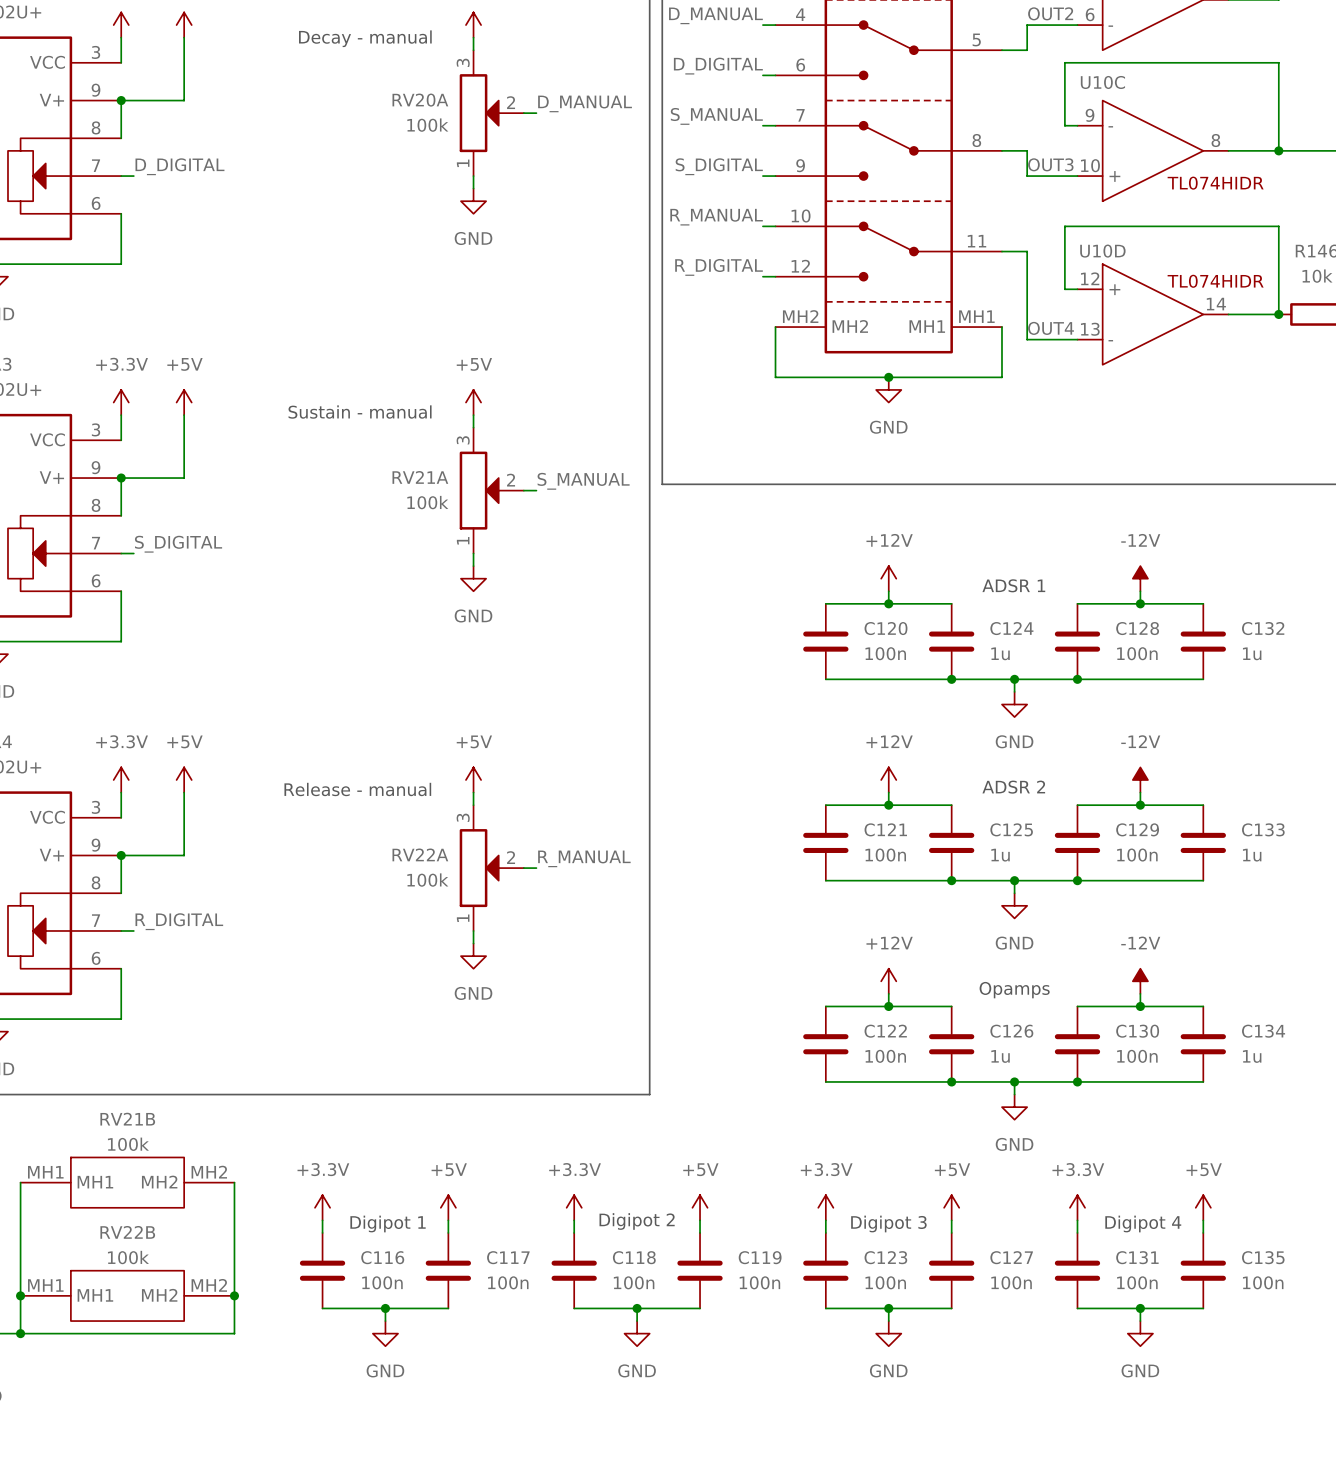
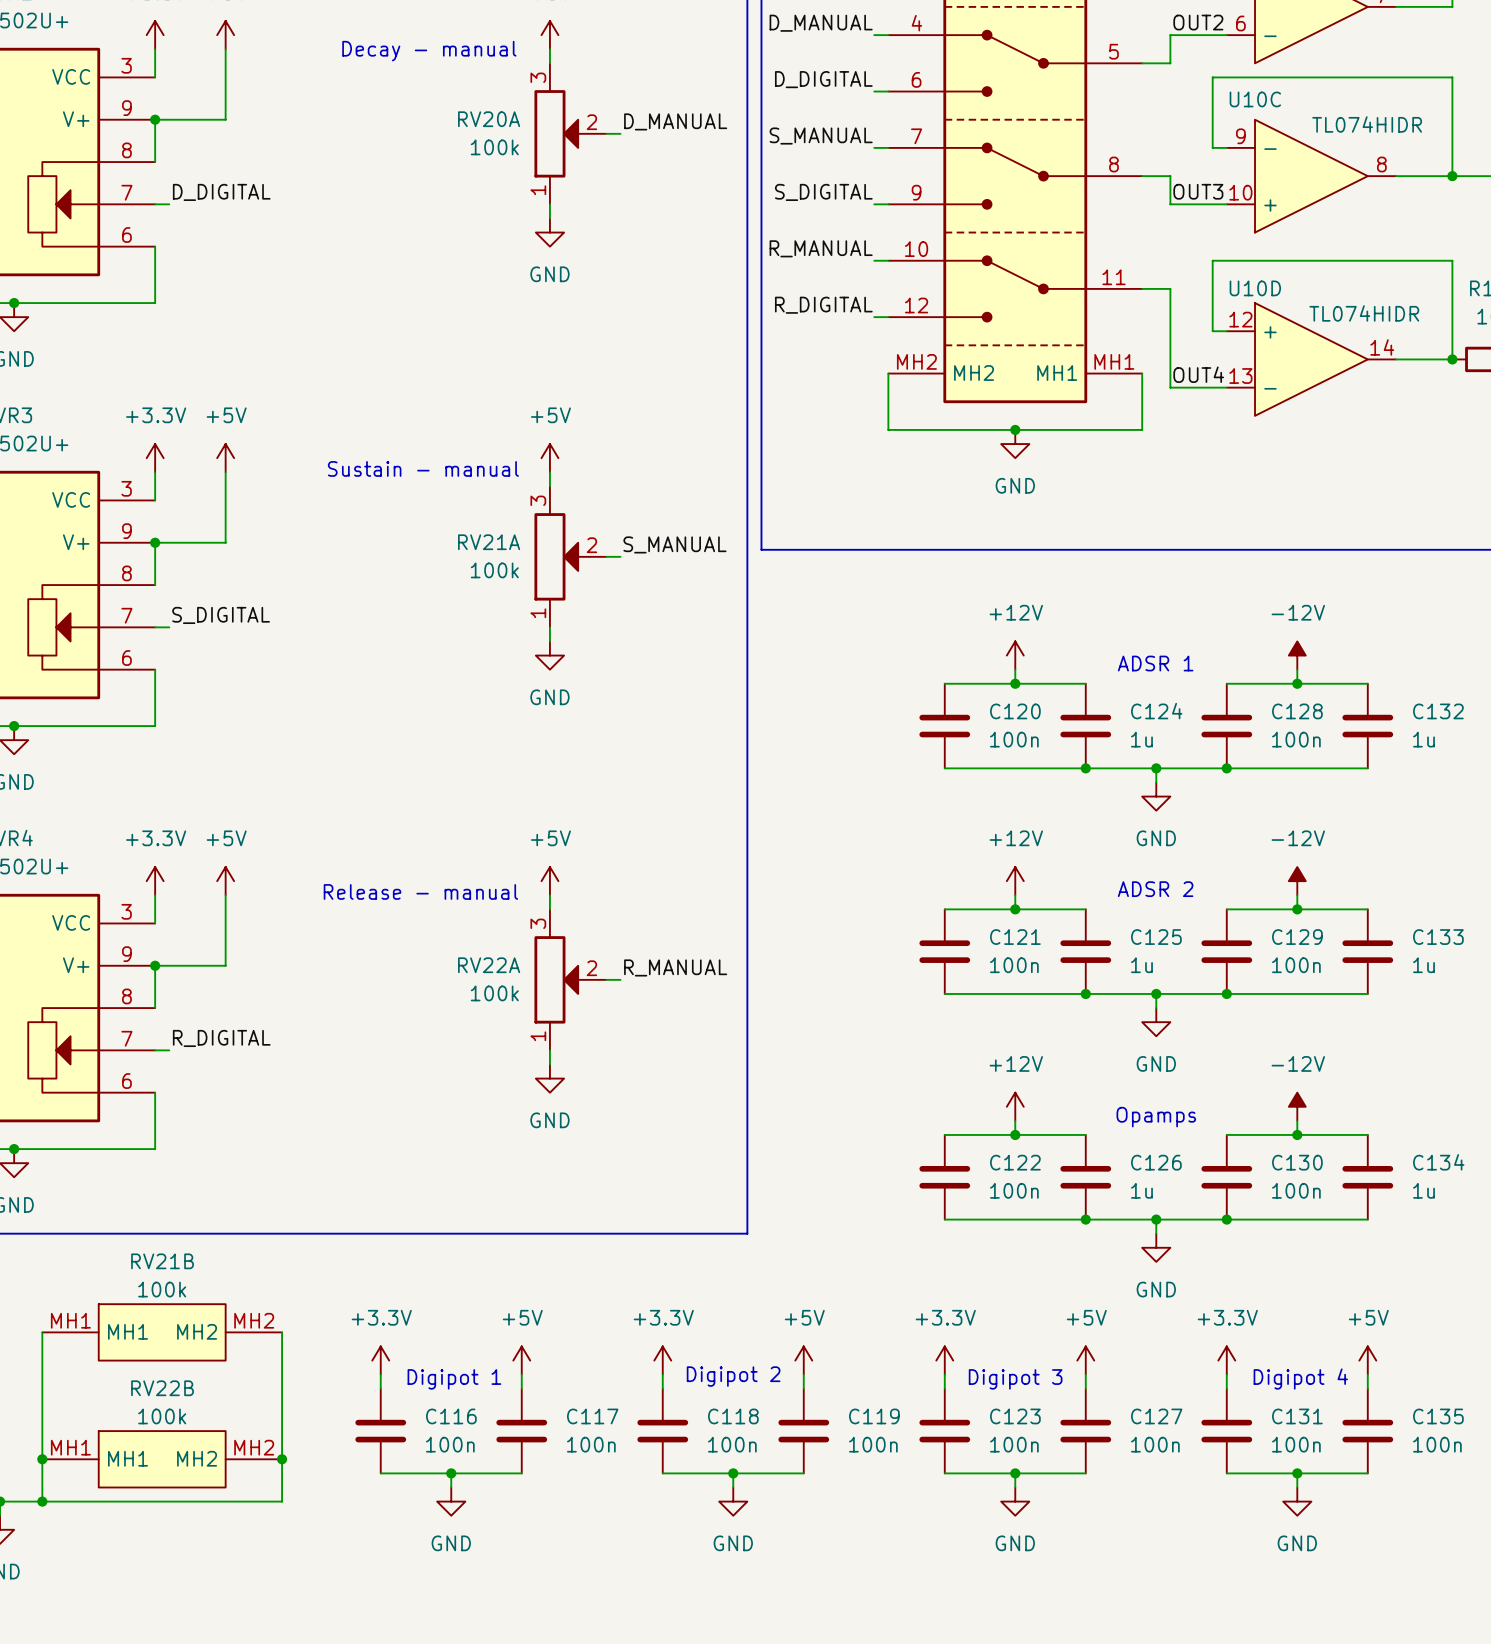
U10C value: none -> TL074HIDR (1367, 124)
U10C text: TL074HIDR (1215, 183) -> none
U10D value: none -> TL074HIDR (1364, 313)
U10D text: TL074HIDR (1215, 281) -> none

